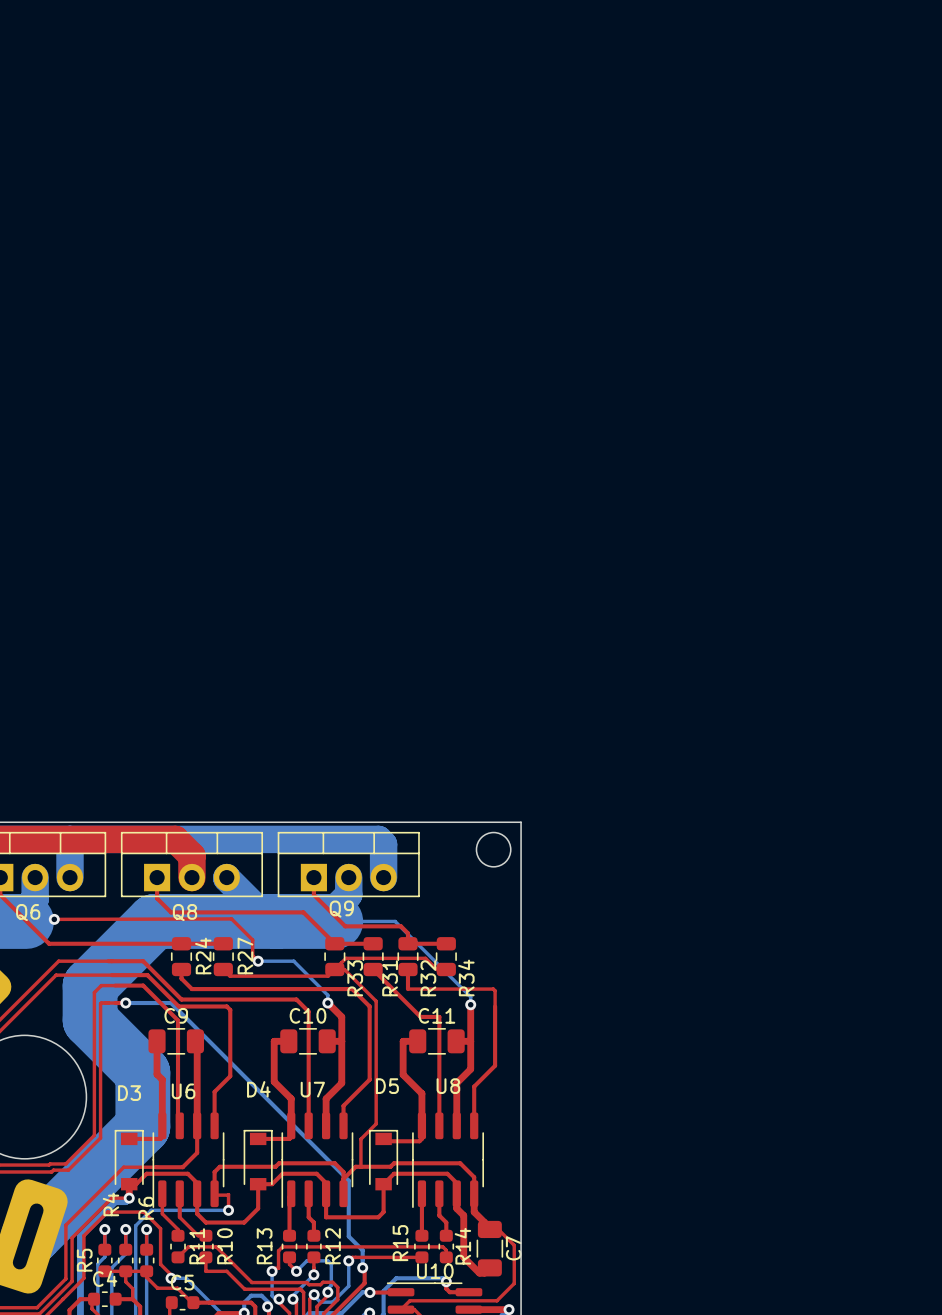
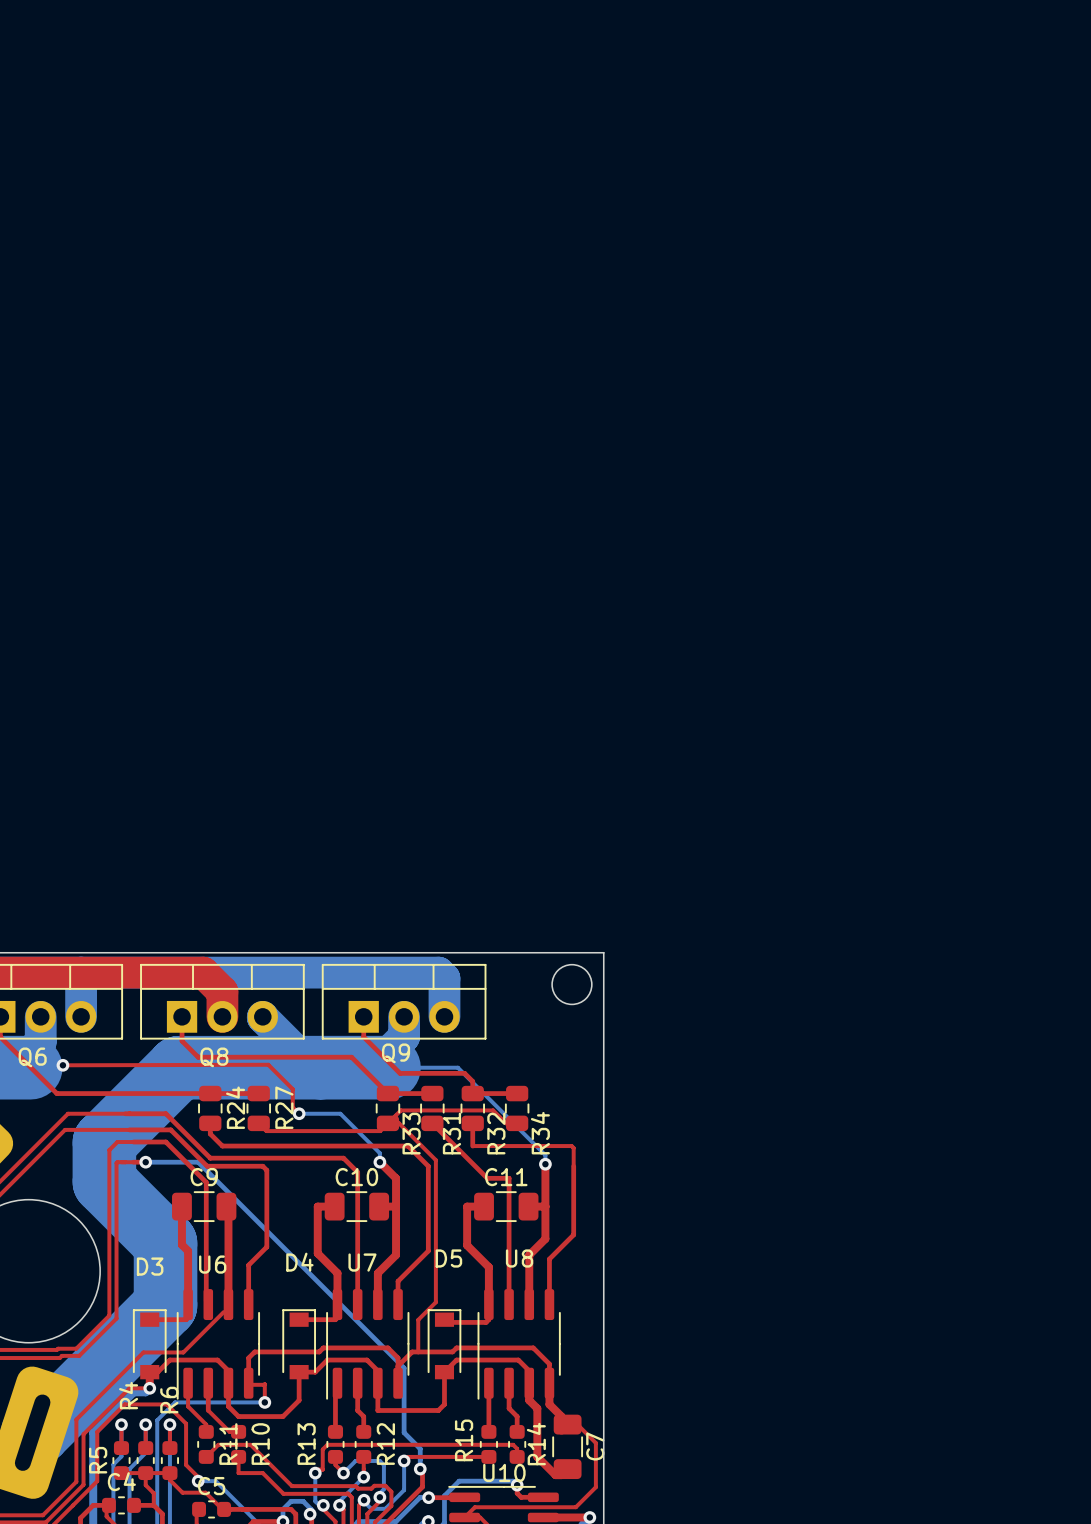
top track: (197, 1125) (197, 1152) (182, 1167) (155, 1167) -> none
top track: none -> (223, 1312) (183, 1352)

